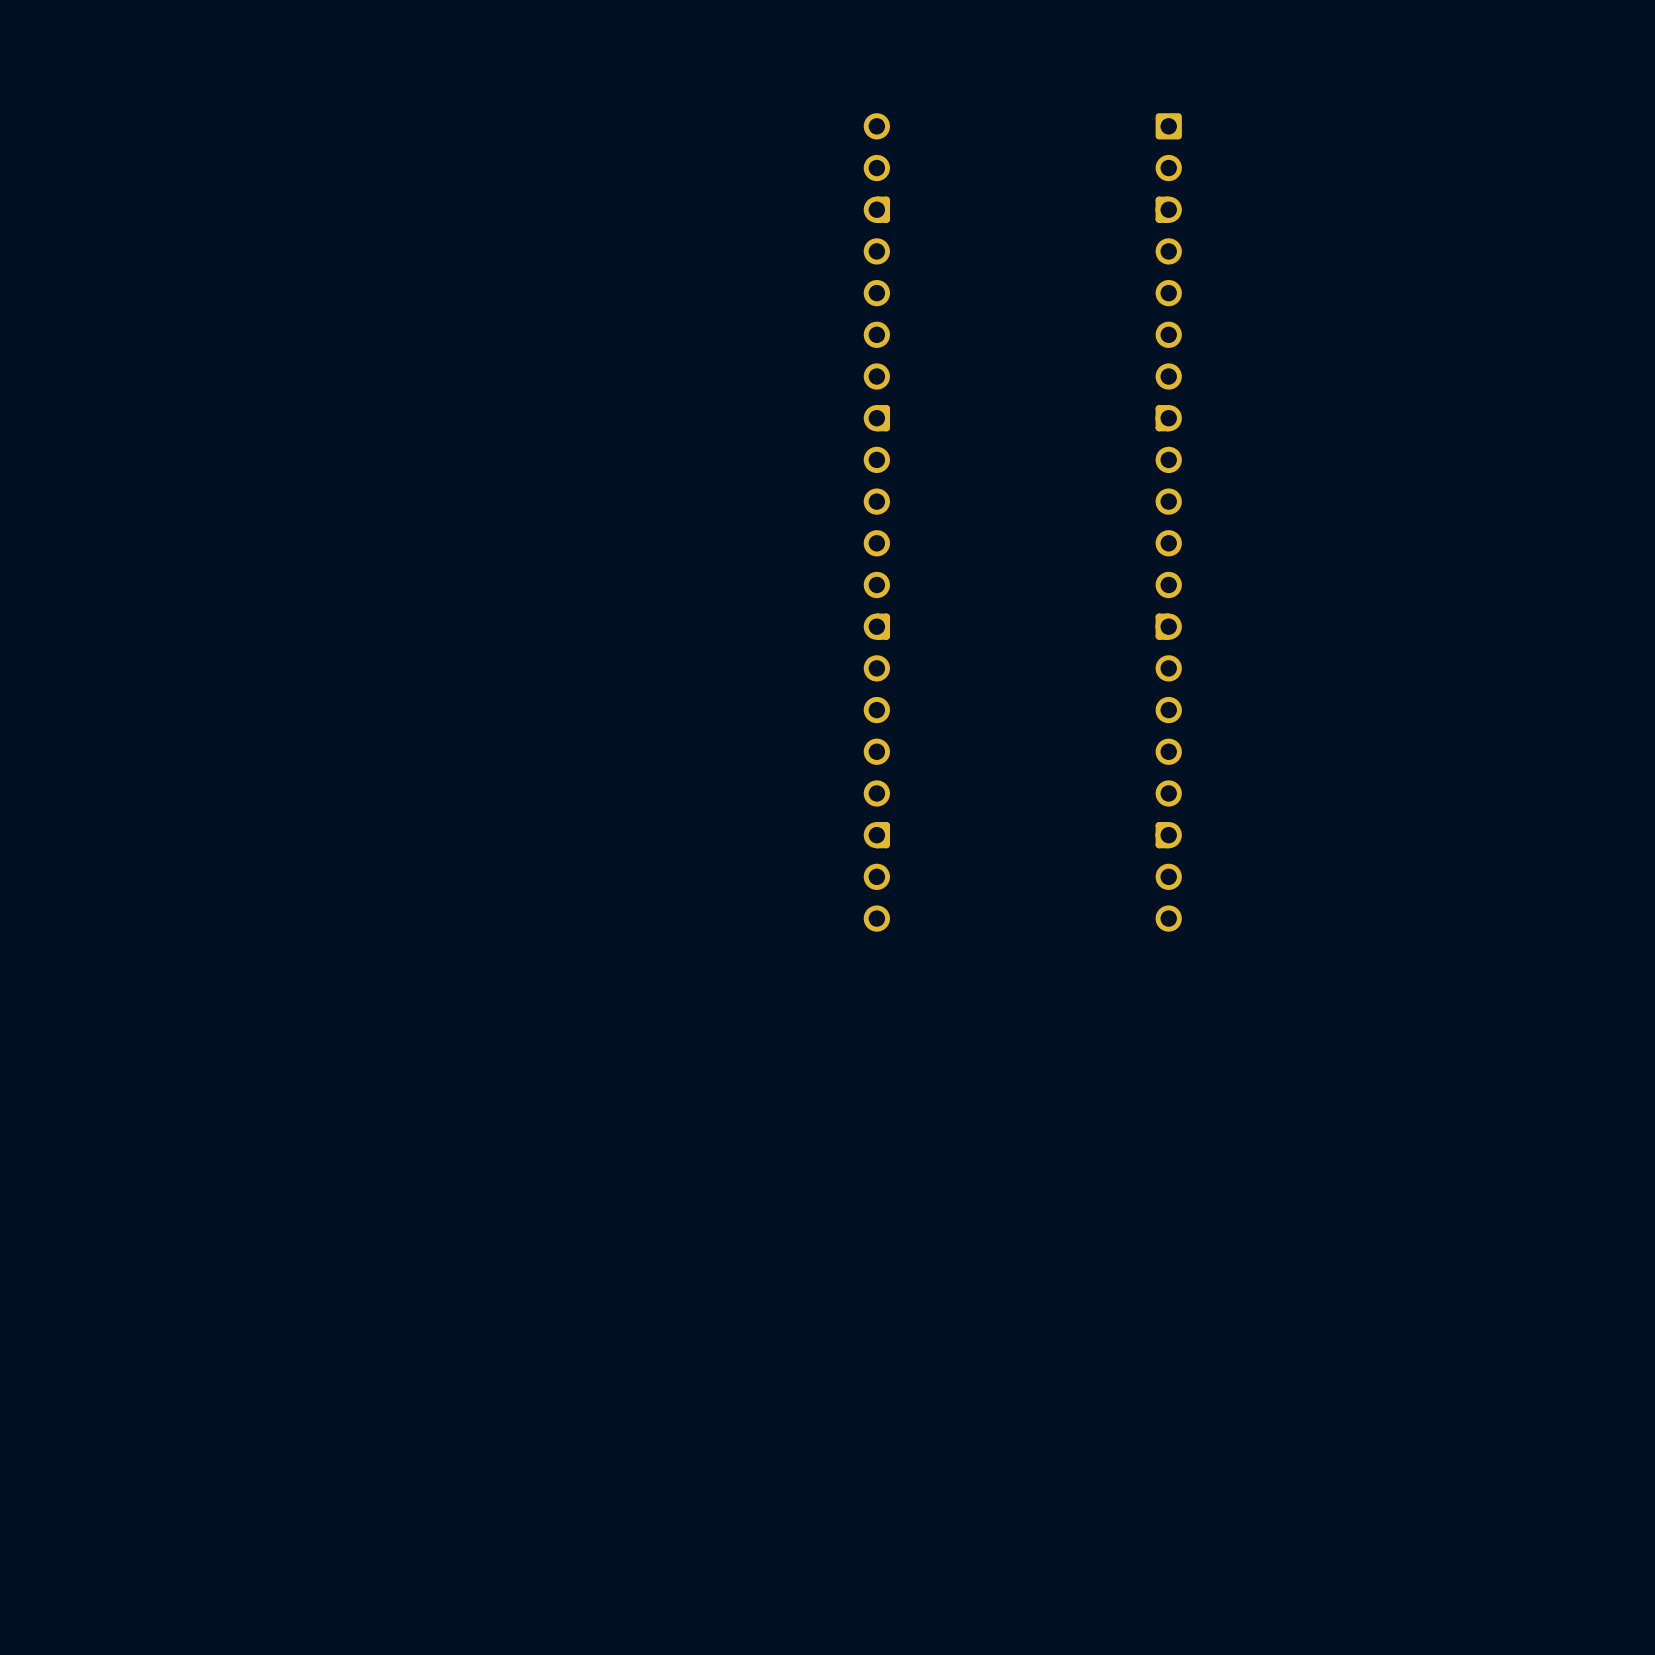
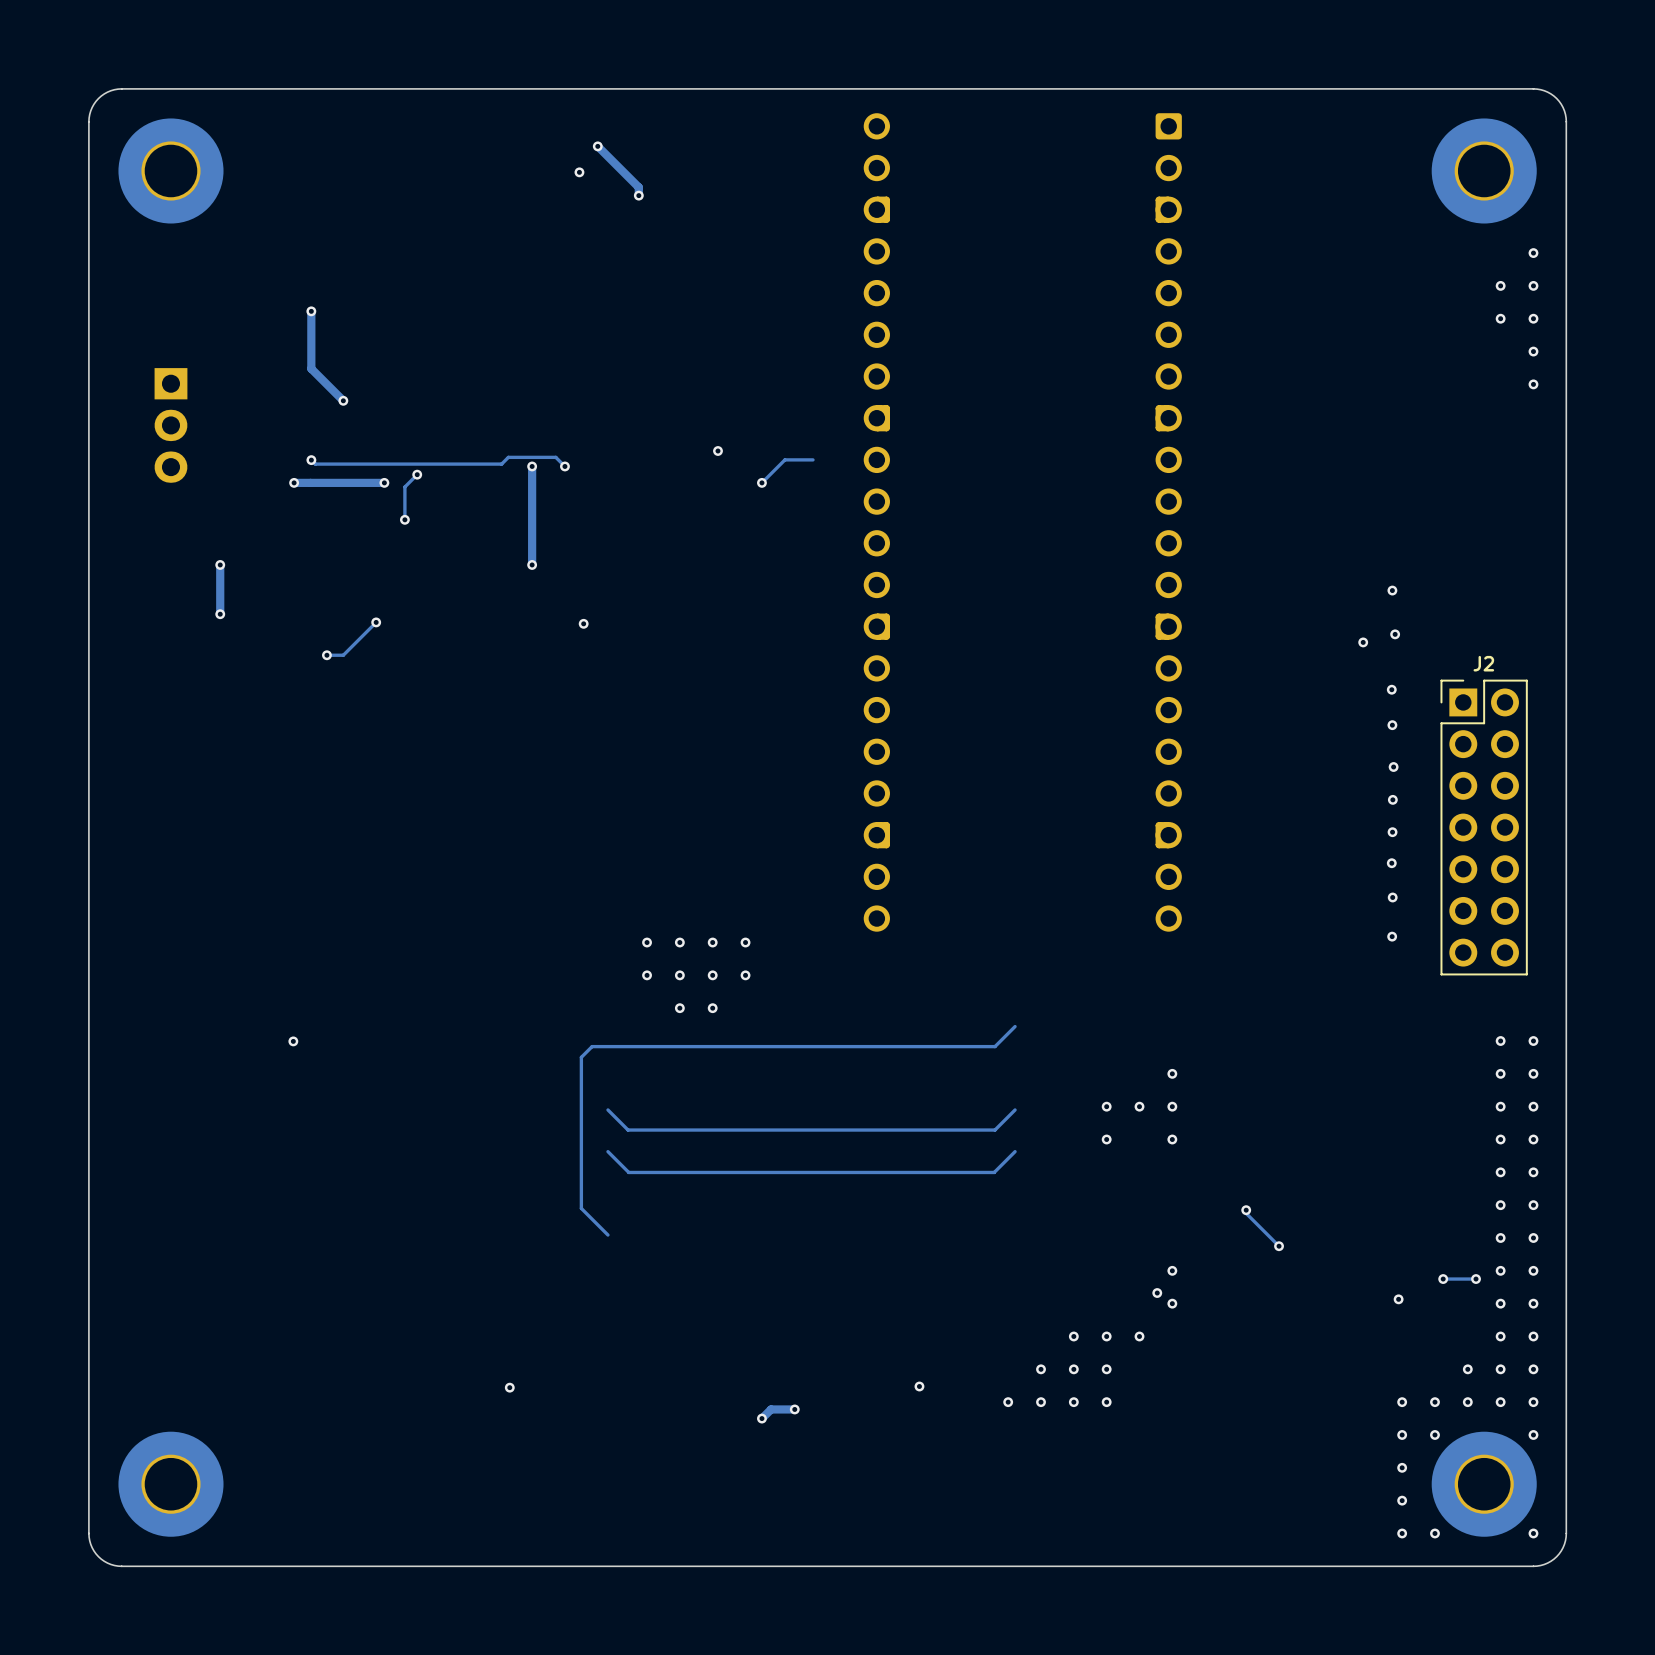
board edge: none -> (1533, 88) (121, 88) (110, 90) (98, 98) (90, 110) (88, 121) (88, 1533) (90, 1544) (98, 1556) (107, 1563) (121, 1566) (1533, 1566) (1544, 1564) (1556, 1556) (1563, 1547) (1566, 1533) (1566, 121) (1564, 110) (1556, 98) (1544, 90) (1533, 88)
track: none -> (597, 146) (638, 187) (638, 195)
via: none -> (597, 146)
part: none -> (170, 170)
part: none -> (1484, 170)
via: none -> (579, 172)
via: none -> (638, 195)
via: none -> (1533, 253)
via: none -> (1500, 285)
via: none -> (1533, 285)
track: none -> (311, 311) (311, 368) (343, 400)
via: none -> (311, 311)
via: none -> (1500, 318)
via: none -> (1533, 318)
via: none -> (1533, 351)
via: none -> (1533, 384)
via: none -> (343, 400)
part: none -> (170, 425)
via: none -> (717, 451)
track: none -> (813, 459) (784, 459) (761, 482)
track: none -> (311, 460) (315, 464) (501, 464) (508, 457) (555, 457) (564, 466)
via: none -> (311, 460)
track: none -> (532, 466) (532, 564)
via: none -> (532, 466)
via: none -> (564, 466)
track: none -> (417, 474) (404, 486) (404, 519)
via: none -> (417, 474)
via: none -> (294, 482)
track: none -> (384, 482) (294, 482)
via: none -> (384, 482)
via: none -> (761, 482)
via: none -> (404, 519)
track: none -> (220, 564) (220, 614)
via: none -> (220, 564)
via: none -> (532, 564)
via: none -> (1392, 590)
via: none -> (220, 614)
track: none -> (376, 622) (343, 655) (326, 655)
via: none -> (376, 622)
via: none -> (583, 623)
via: none -> (1395, 634)
via: none -> (1363, 642)
via: none -> (326, 655)
via: none -> (1391, 689)
via: none -> (1392, 725)
via: none -> (1393, 767)
via: none -> (1392, 799)
J2: none -> (1484, 827)
via: none -> (1392, 832)
via: none -> (1391, 863)
via: none -> (1392, 897)
via: none -> (1392, 936)
via: none -> (647, 942)
via: none -> (679, 942)
via: none -> (712, 942)
via: none -> (745, 942)
via: none -> (647, 975)
via: none -> (679, 975)
via: none -> (712, 975)
via: none -> (745, 975)
via: none -> (679, 1008)
via: none -> (712, 1008)
track: none -> (1015, 1026) (995, 1046) (592, 1046) (581, 1057) (581, 1208) (607, 1235)
via: none -> (293, 1041)
via: none -> (1500, 1041)
via: none -> (1533, 1041)
via: none -> (1172, 1073)
via: none -> (1500, 1073)
via: none -> (1533, 1073)
via: none -> (1106, 1106)
via: none -> (1139, 1106)
via: none -> (1172, 1106)
via: none -> (1500, 1106)
via: none -> (1533, 1106)
track: none -> (1015, 1109) (994, 1130) (628, 1130) (607, 1109)
via: none -> (1106, 1139)
via: none -> (1172, 1139)
via: none -> (1500, 1139)
via: none -> (1533, 1139)
track: none -> (1015, 1151) (994, 1172) (628, 1172) (607, 1151)
via: none -> (1500, 1172)
via: none -> (1533, 1172)
via: none -> (1500, 1205)
via: none -> (1533, 1205)
track: none -> (1246, 1210) (1246, 1213) (1279, 1246)
via: none -> (1246, 1210)
via: none -> (1500, 1238)
via: none -> (1533, 1238)
via: none -> (1279, 1246)
via: none -> (1172, 1270)
via: none -> (1500, 1270)
via: none -> (1533, 1270)
via: none -> (1443, 1279)
track: none -> (1476, 1279) (1443, 1279)
via: none -> (1476, 1279)
via: none -> (1157, 1293)
via: none -> (1398, 1299)
via: none -> (1172, 1303)
via: none -> (1500, 1303)
via: none -> (1533, 1303)
via: none -> (1073, 1336)
via: none -> (1106, 1336)
via: none -> (1139, 1336)
via: none -> (1500, 1336)
via: none -> (1533, 1336)
via: none -> (1041, 1369)
via: none -> (1073, 1369)
via: none -> (1106, 1369)
via: none -> (1467, 1369)
via: none -> (1500, 1369)
via: none -> (1533, 1369)
via: none -> (919, 1386)
via: none -> (509, 1387)
via: none -> (1008, 1402)
via: none -> (1041, 1402)
via: none -> (1073, 1402)
via: none -> (1106, 1402)
via: none -> (1402, 1402)
via: none -> (1434, 1402)
via: none -> (1467, 1402)
via: none -> (1500, 1402)
via: none -> (1533, 1402)
track: none -> (794, 1409) (771, 1409) (761, 1418)
via: none -> (794, 1409)
via: none -> (761, 1418)
via: none -> (1402, 1434)
via: none -> (1434, 1434)
via: none -> (1533, 1434)
via: none -> (1402, 1467)
part: none -> (170, 1484)
part: none -> (1484, 1484)
via: none -> (1402, 1500)
via: none -> (1402, 1533)
via: none -> (1434, 1533)
via: none -> (1533, 1533)

